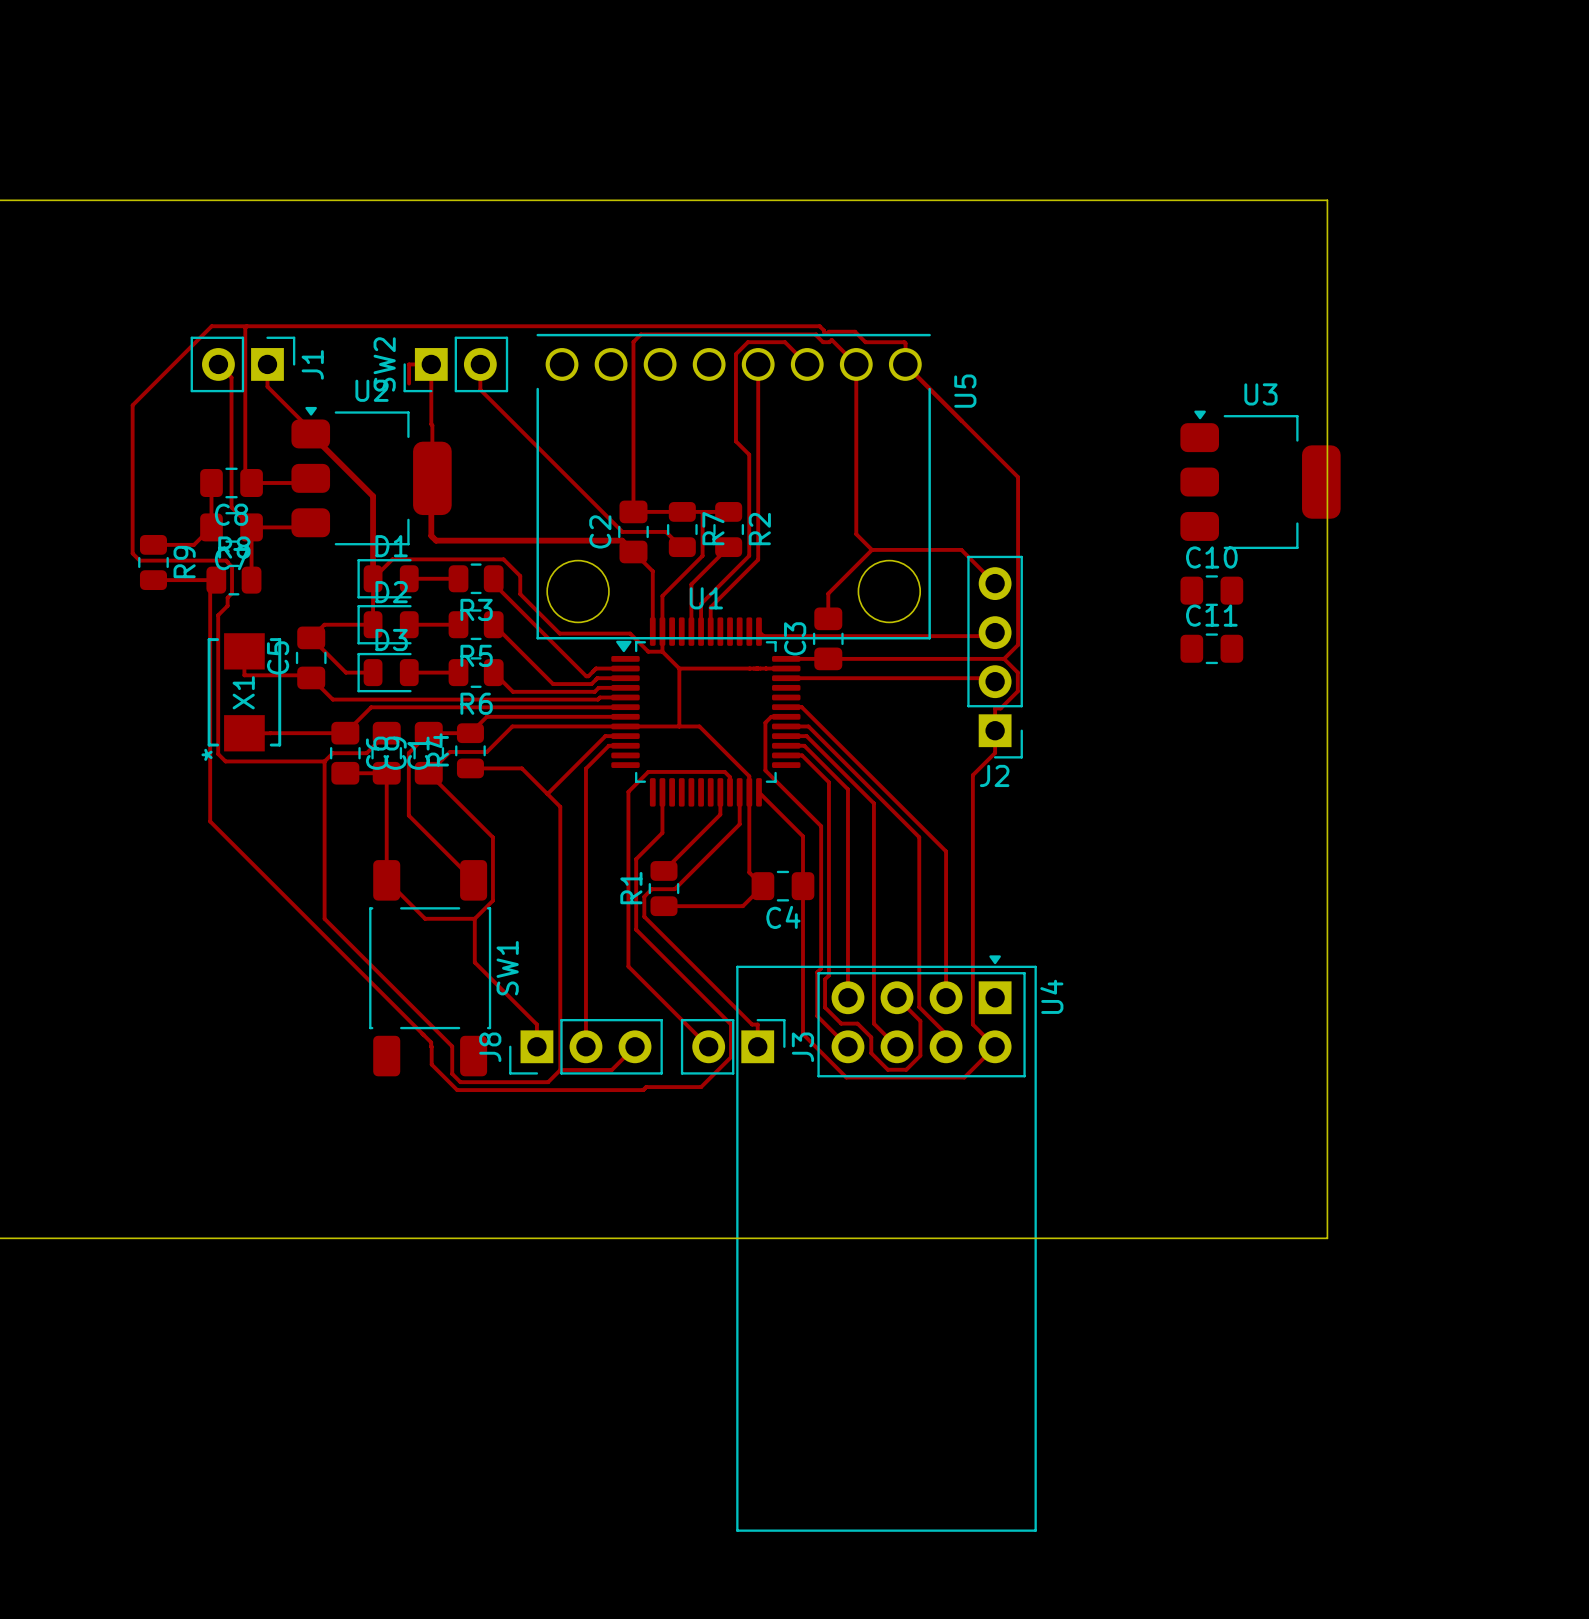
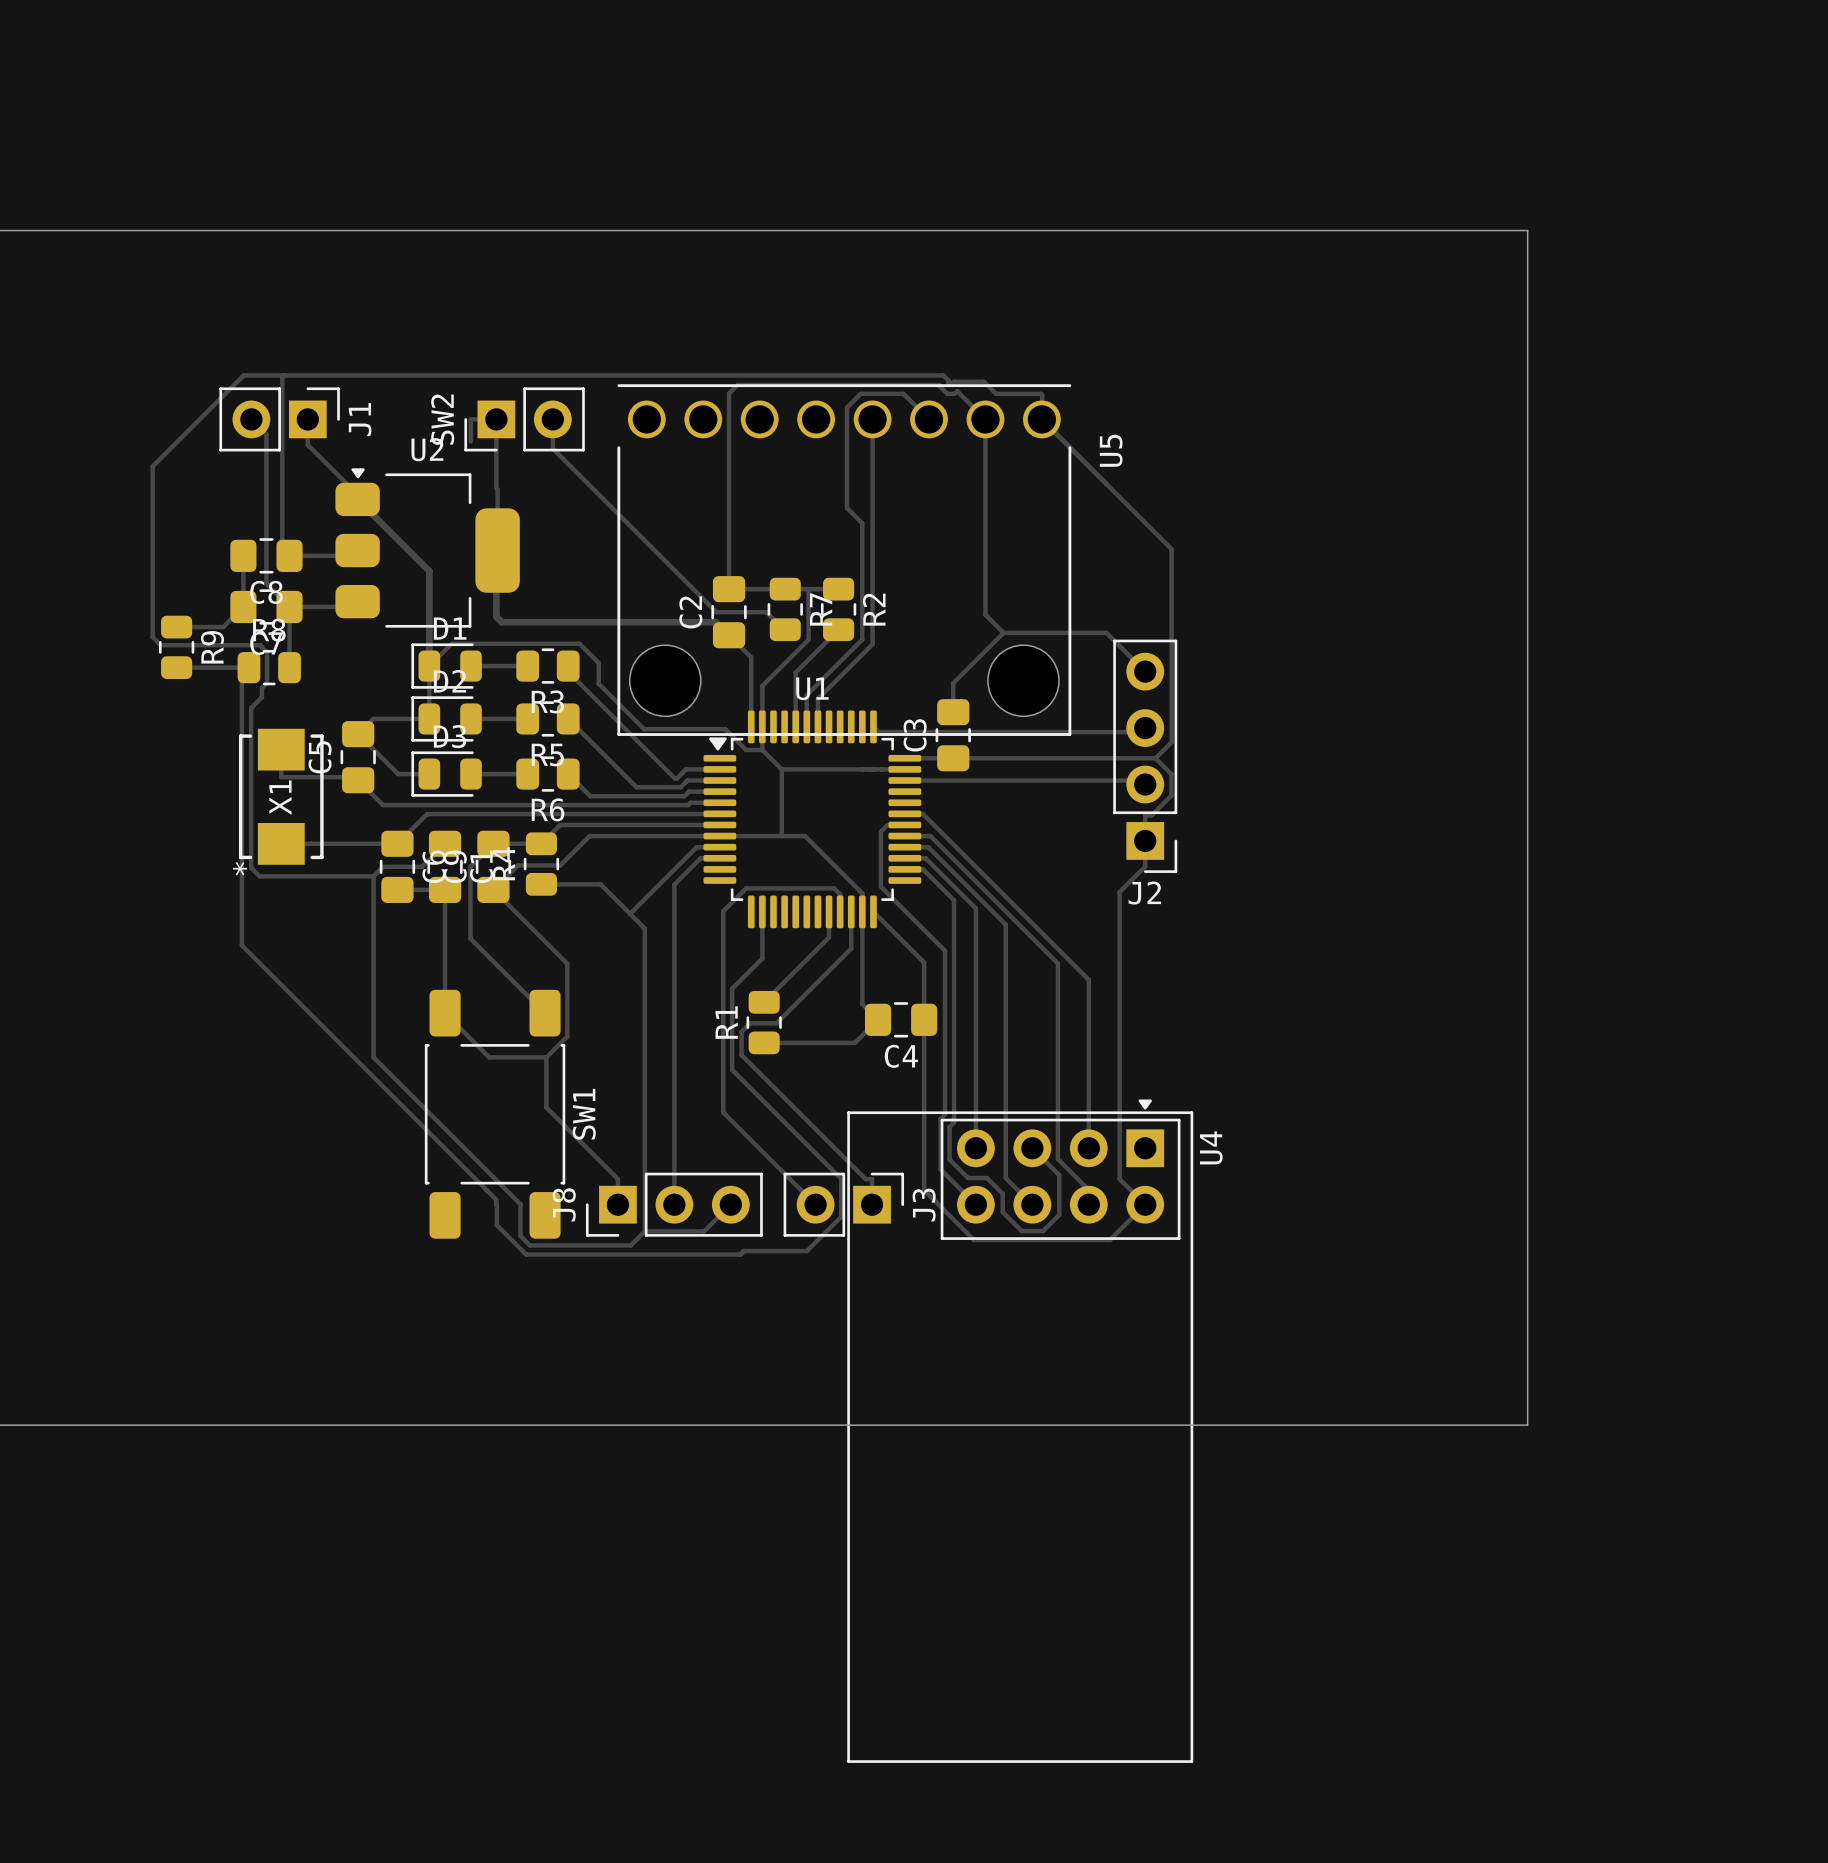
U3: (1260, 479) -> none
C10: (1211, 590) -> none
C11: (1211, 648) -> none

